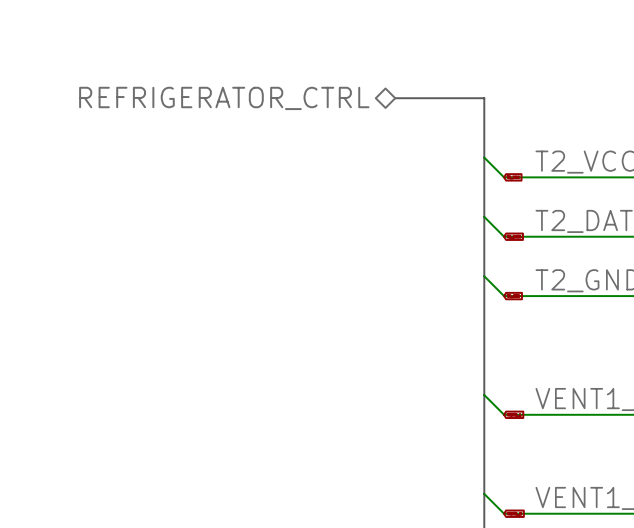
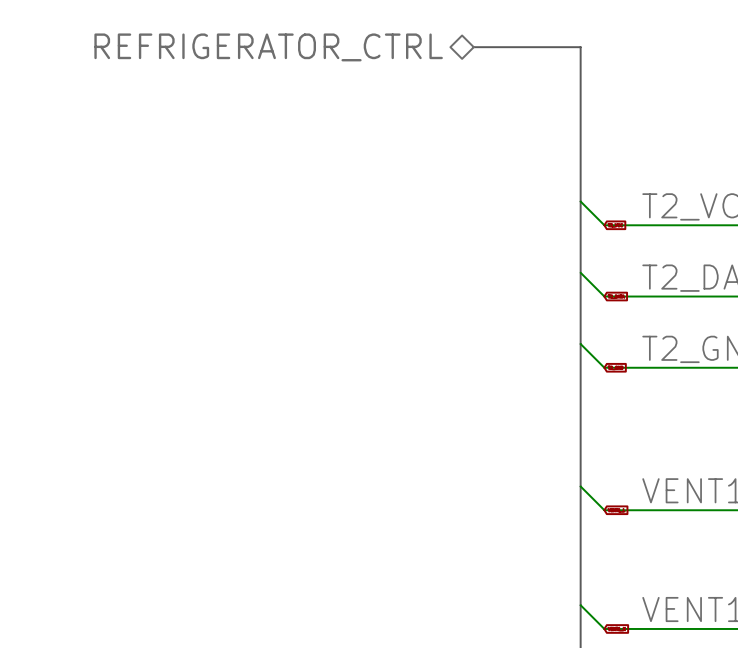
hierarchical label position: REFRIGERATOR_CTRL (224, 98) -> REFRIGERATOR_CTRL (268, 47)
bus: (395, 98) (484, 98) -> (473, 47) (580, 47) (580, 130)

